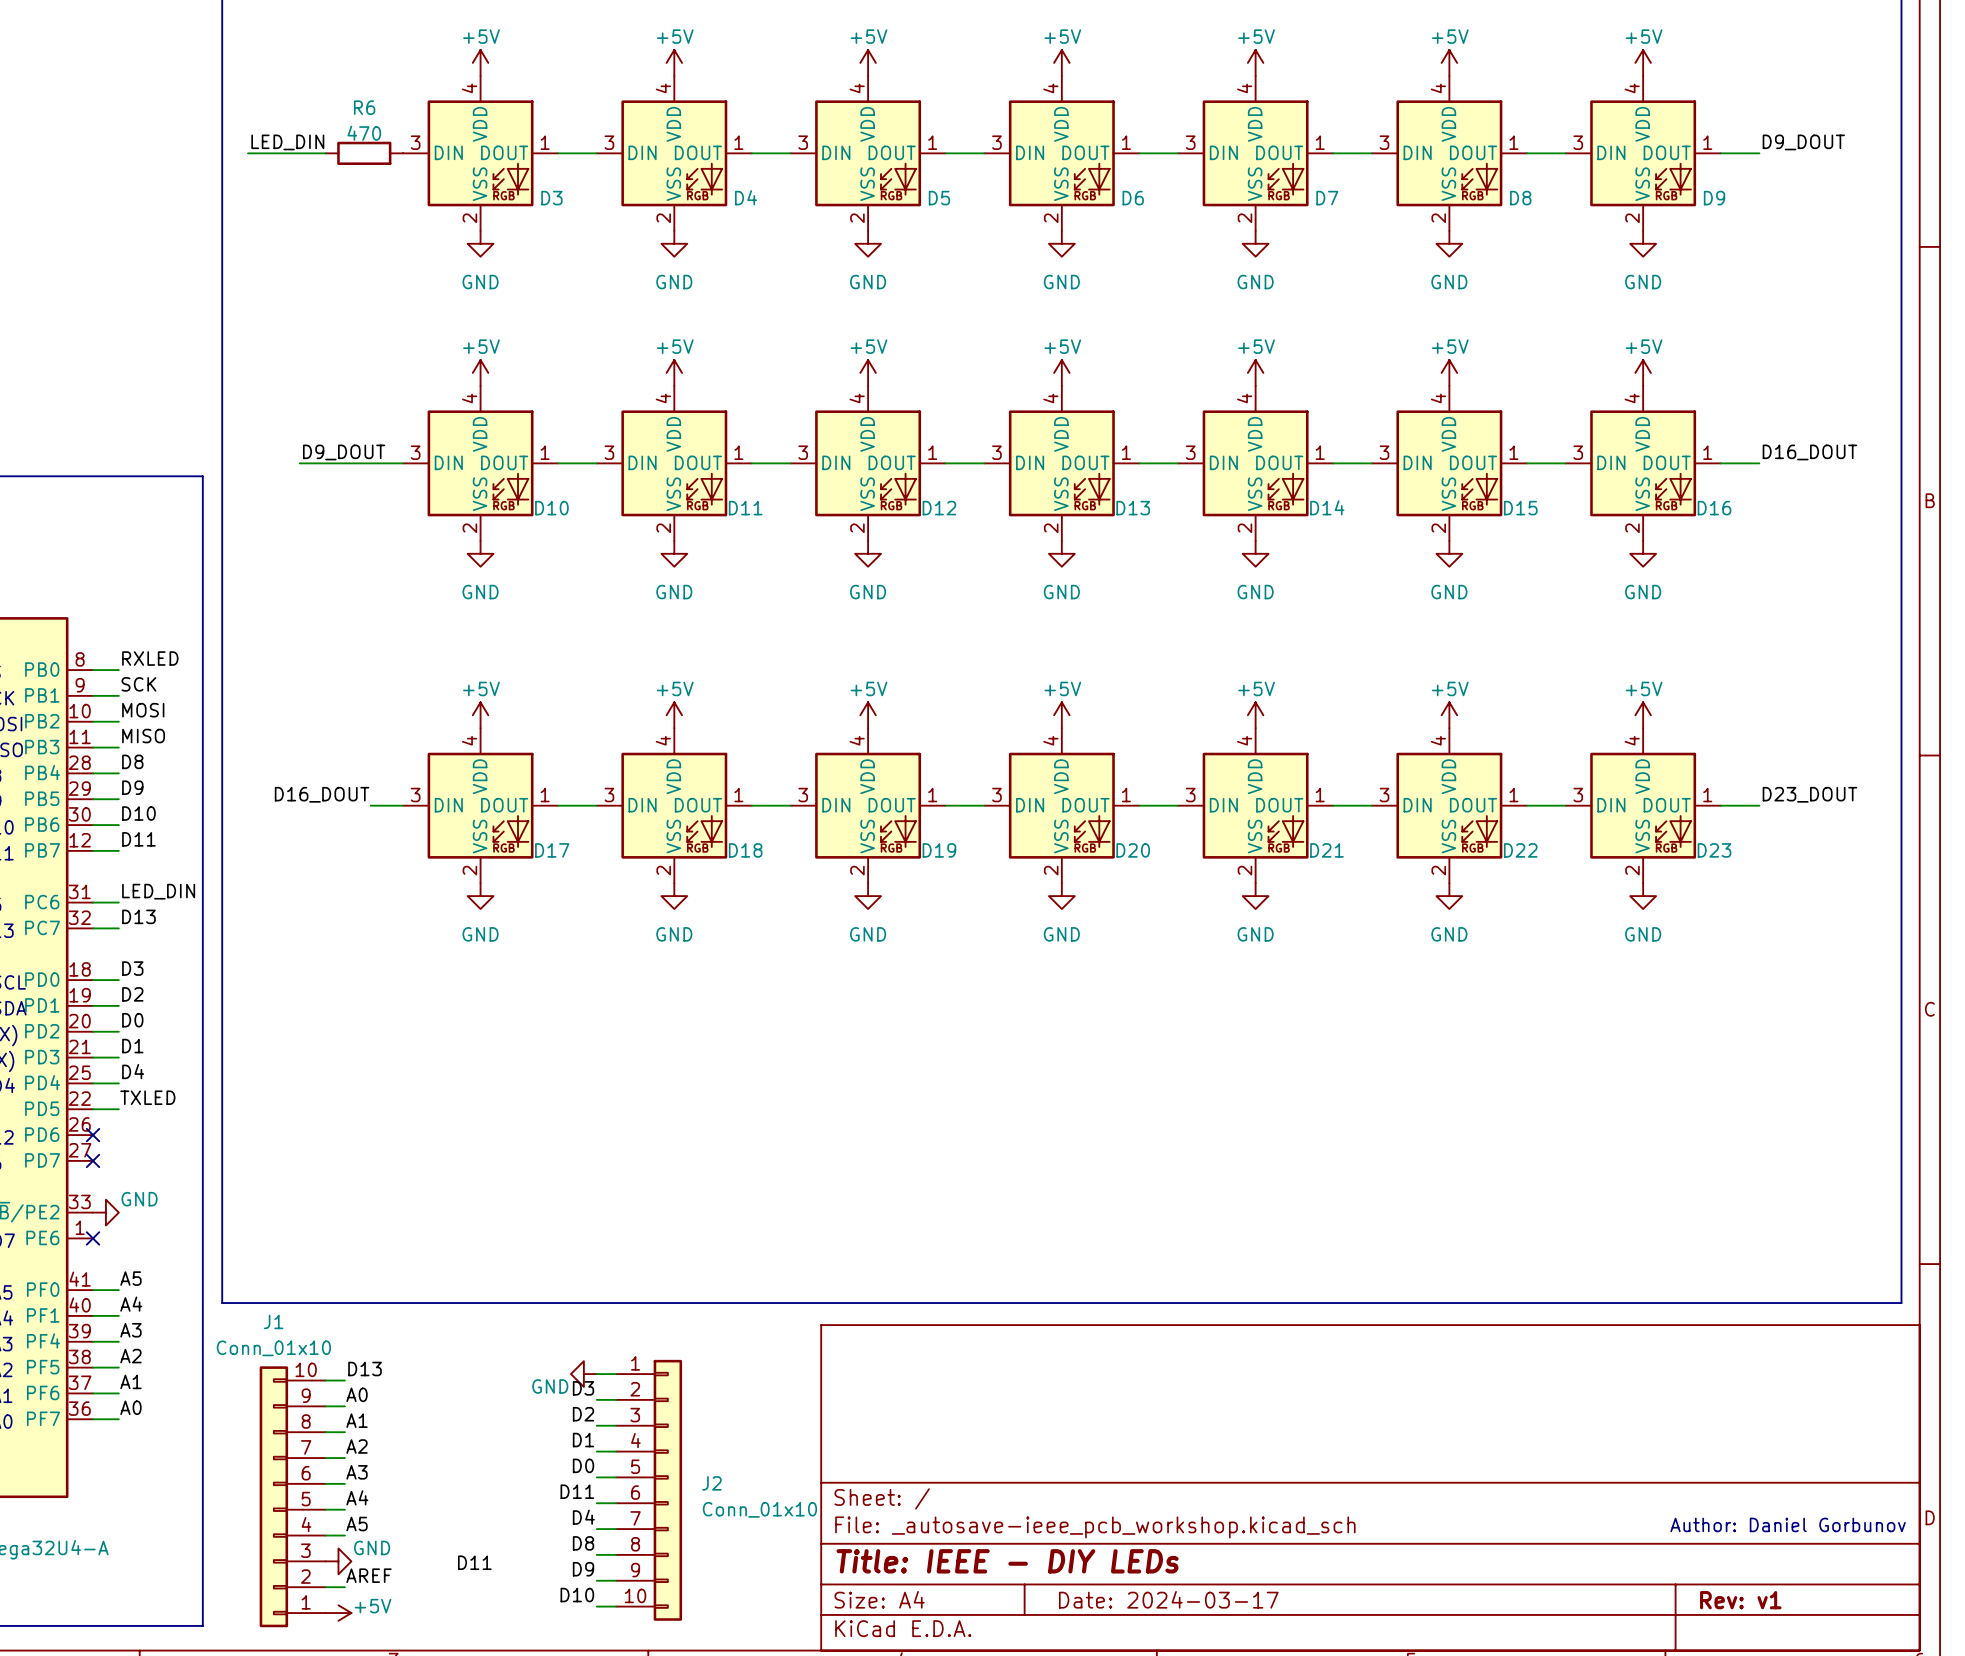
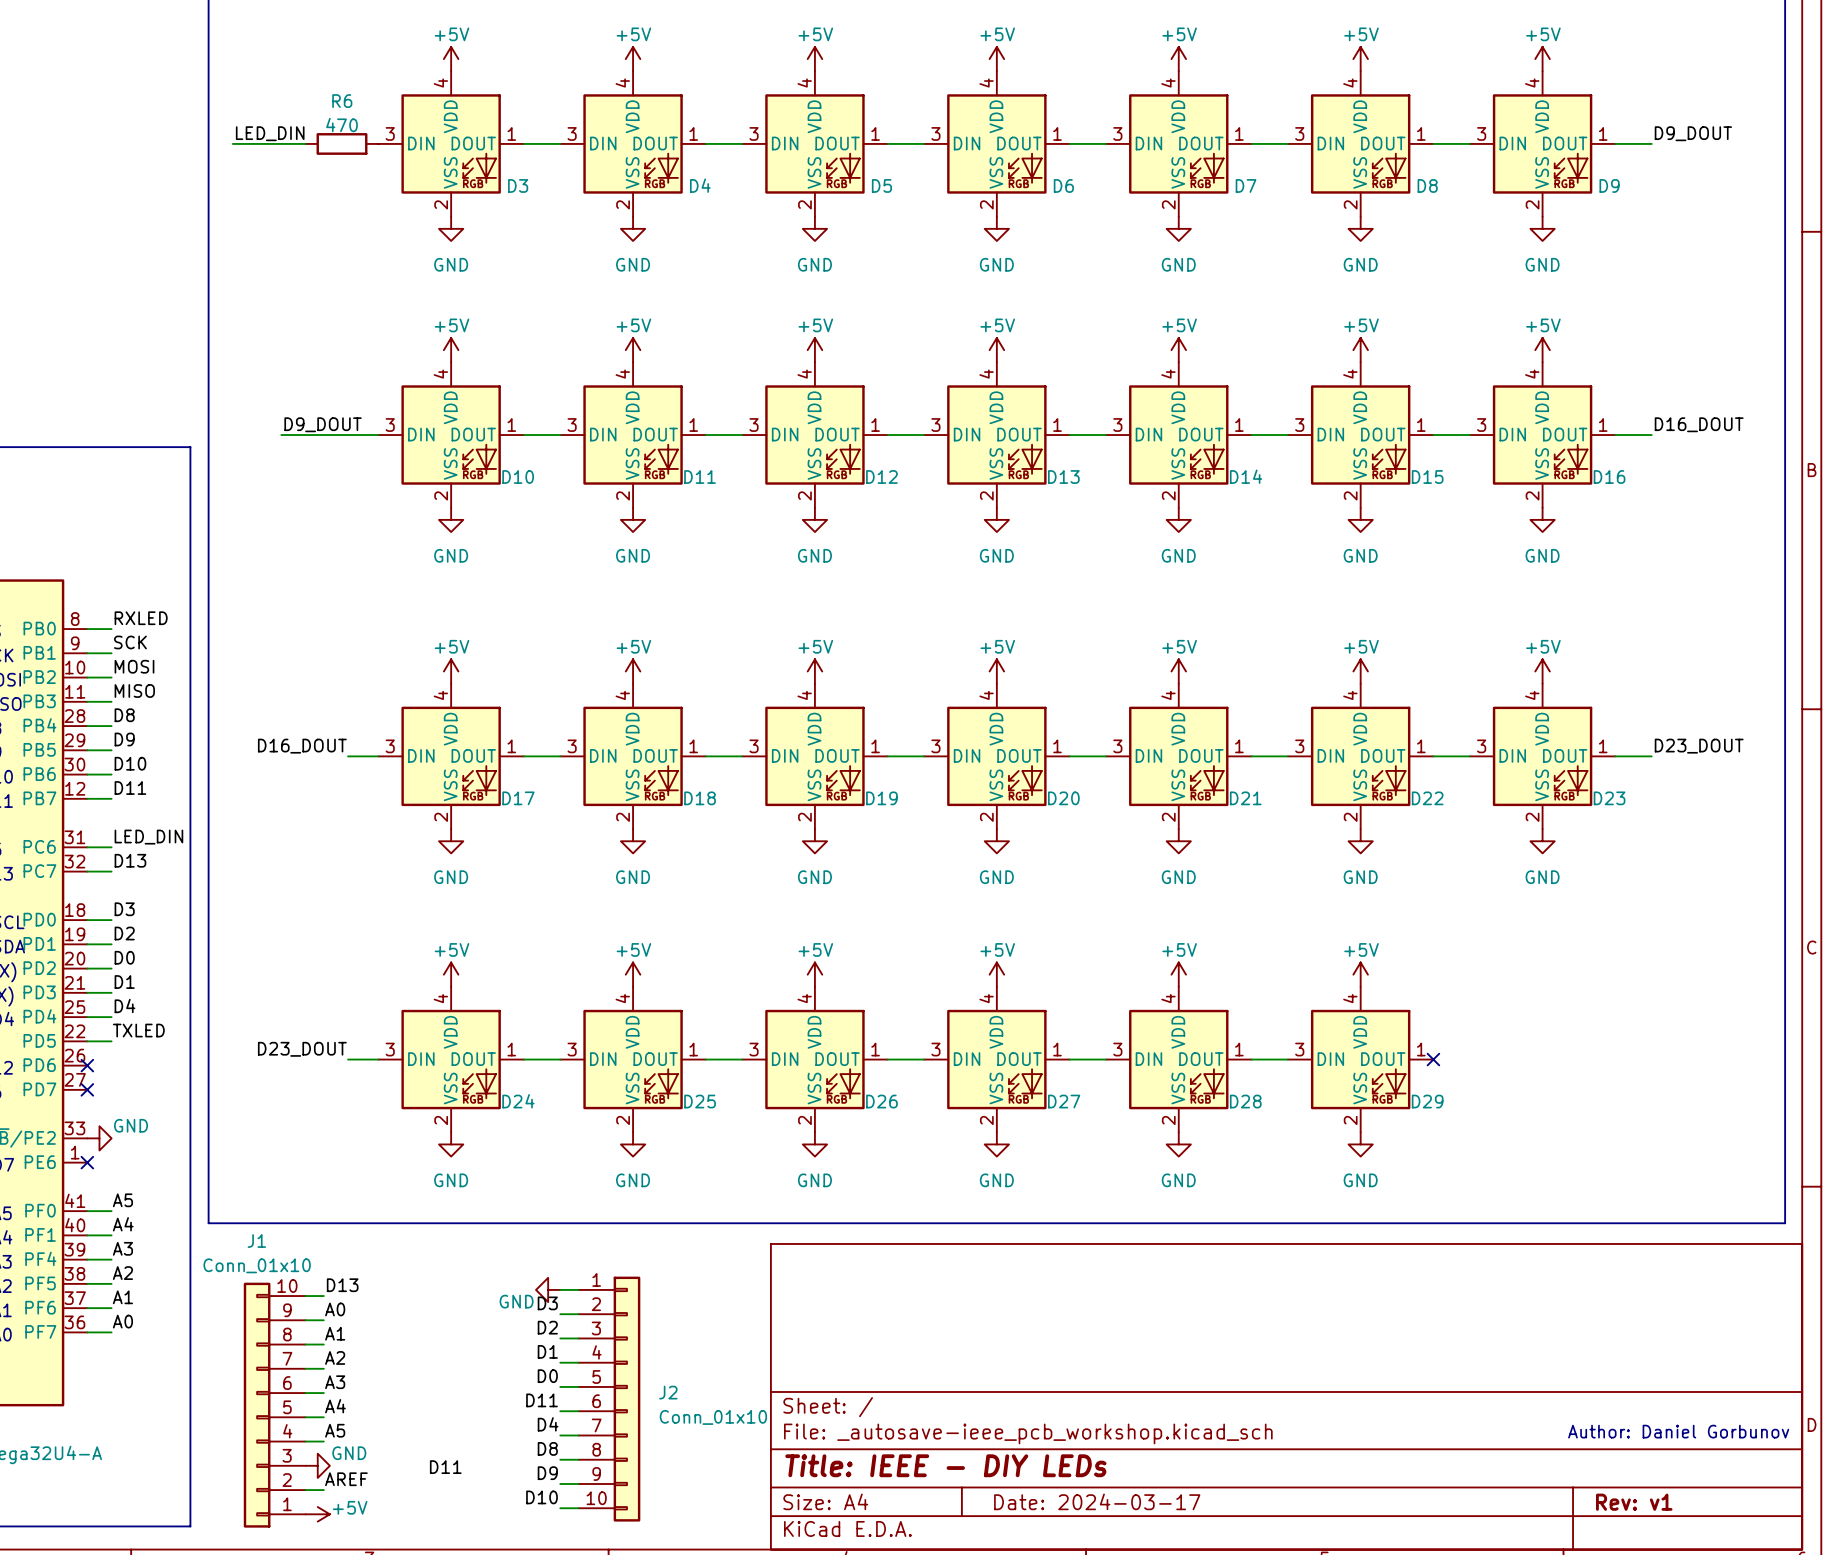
power symbol: none -> +5V (451, 974)
power symbol: none -> +5V (633, 974)
power symbol: none -> +5V (814, 974)
power symbol: none -> +5V (996, 974)
power symbol: none -> +5V (1178, 974)
power symbol: none -> +5V (1360, 974)
label: none -> D23_DOUT (302, 1049)
wire: none -> (348, 1059) (378, 1059)
D24: none -> (451, 1059)
wire: none -> (523, 1059) (560, 1059)
D25: none -> (633, 1059)
wire: none -> (705, 1059) (742, 1059)
D26: none -> (814, 1059)
wire: none -> (887, 1059) (924, 1059)
D27: none -> (996, 1059)
wire: none -> (1069, 1059) (1106, 1059)
D28: none -> (1178, 1059)
wire: none -> (1251, 1059) (1287, 1059)
D29: none -> (1360, 1059)
no-connect mark: none -> (1433, 1059)
power symbol: none -> GND (451, 1144)
power symbol: none -> GND (633, 1144)
power symbol: none -> GND (814, 1144)
power symbol: none -> GND (996, 1144)
power symbol: none -> GND (1178, 1144)
power symbol: none -> GND (1360, 1144)

